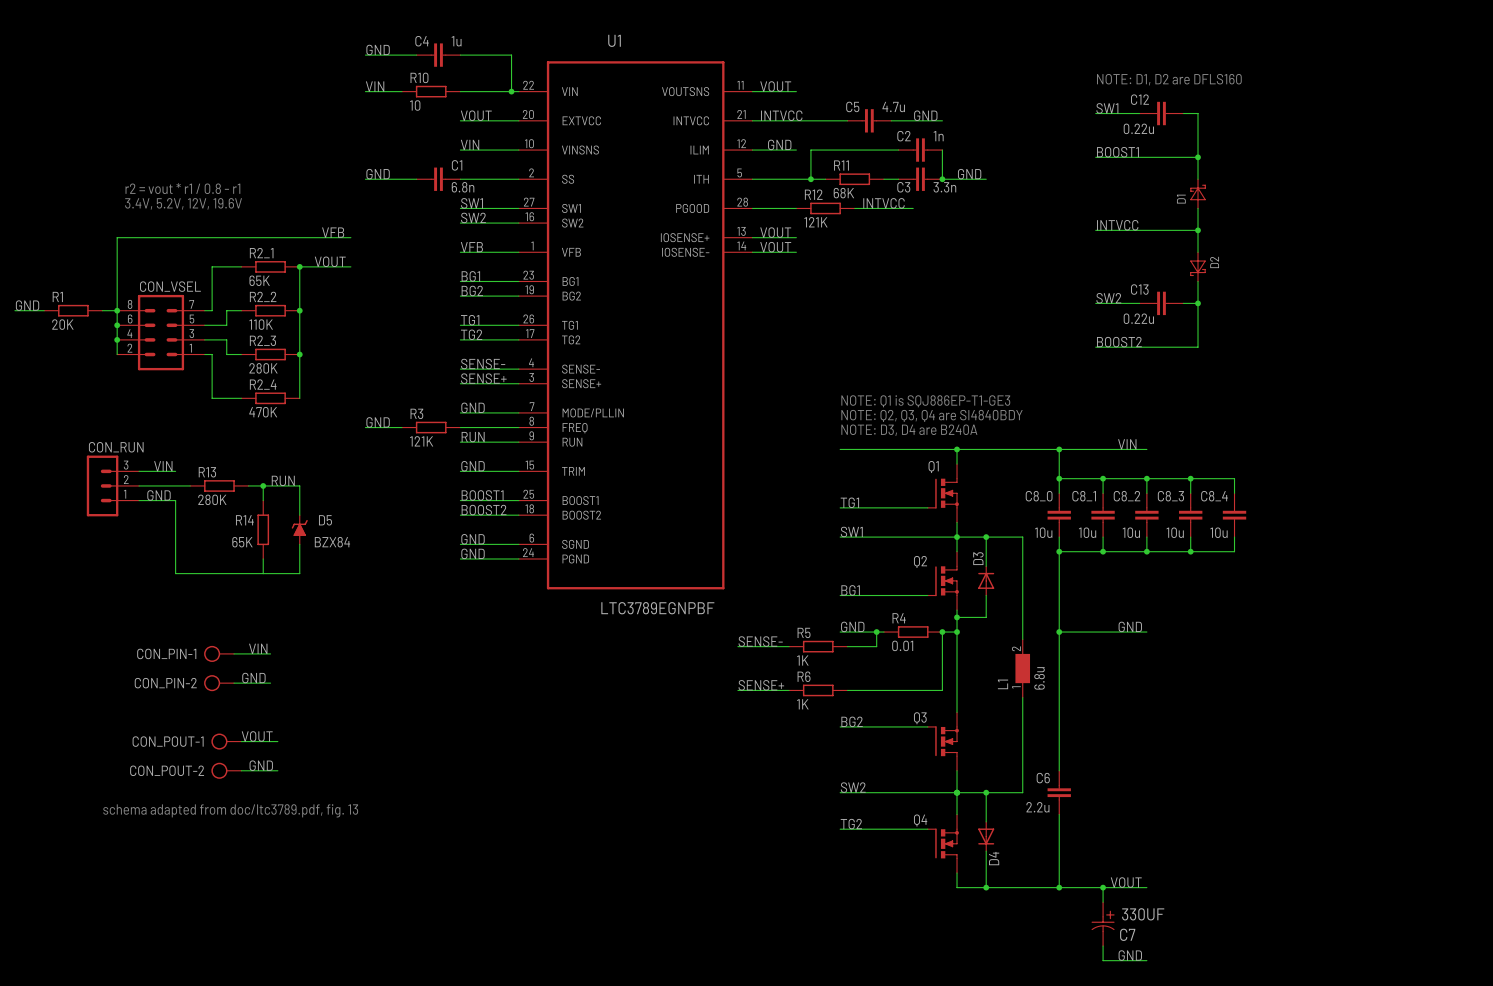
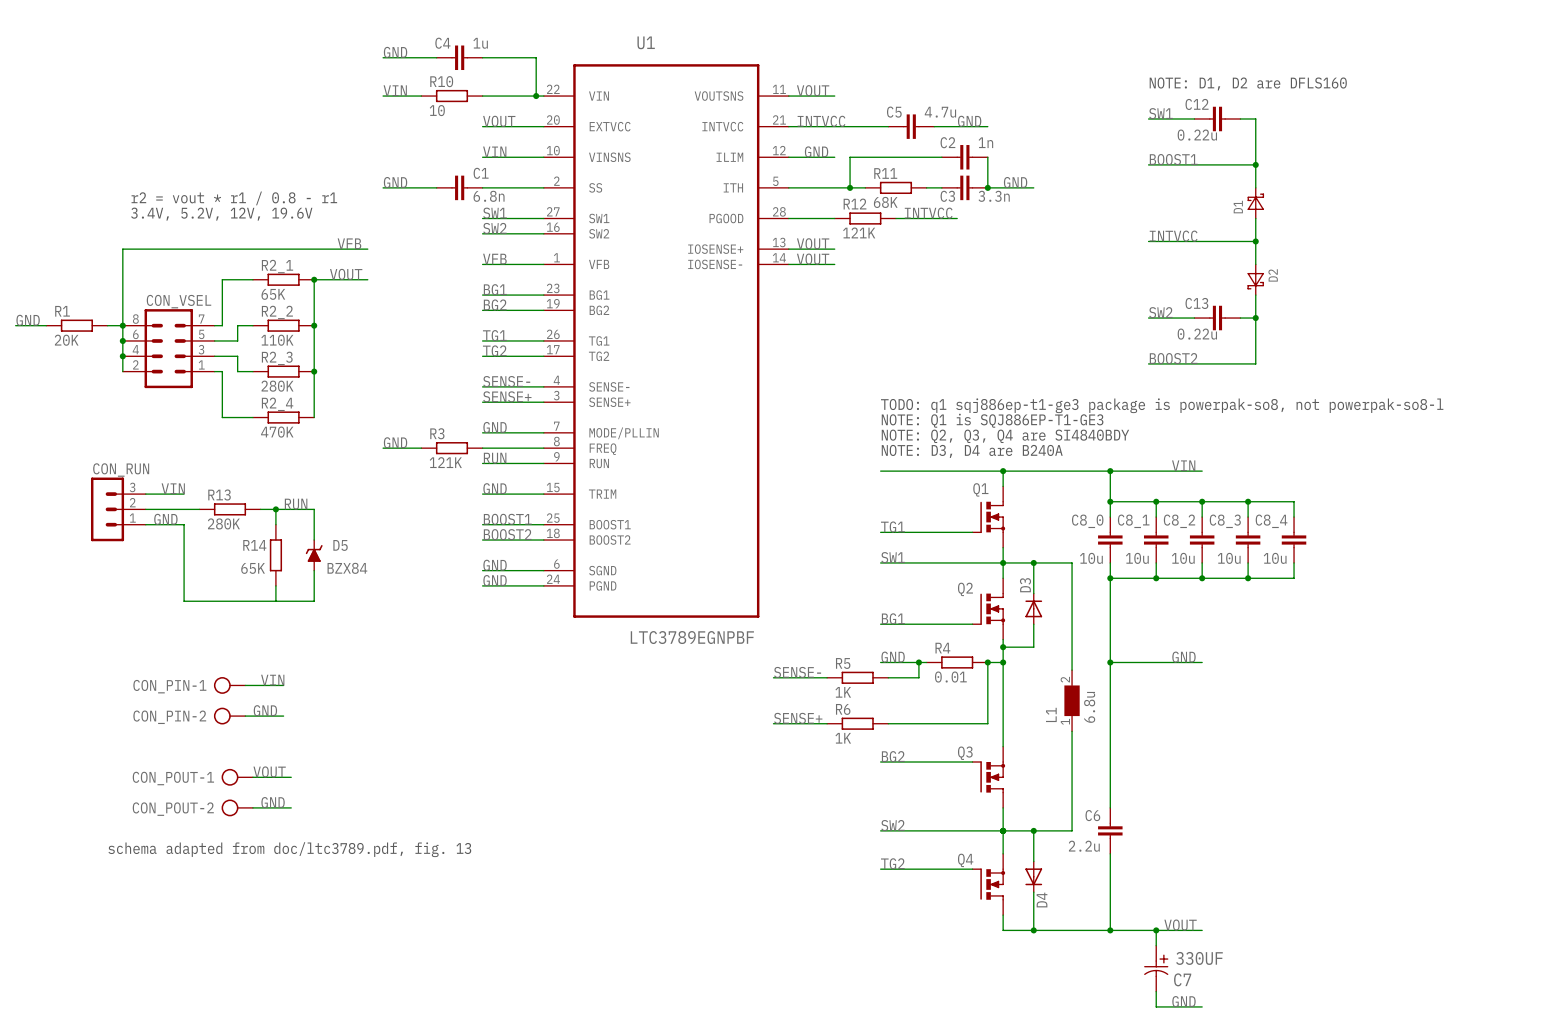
text: none -> TODO: q1 sqj886ep-t1-ge3 package is powerpak-so8, not powerpak-so8-l (1162, 405)

